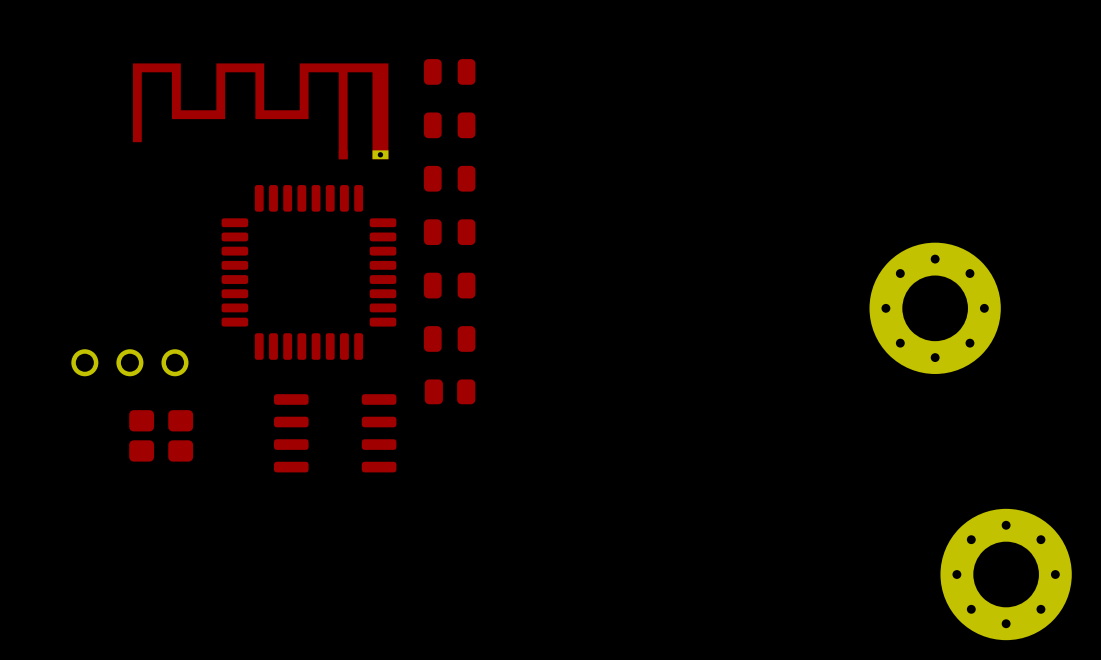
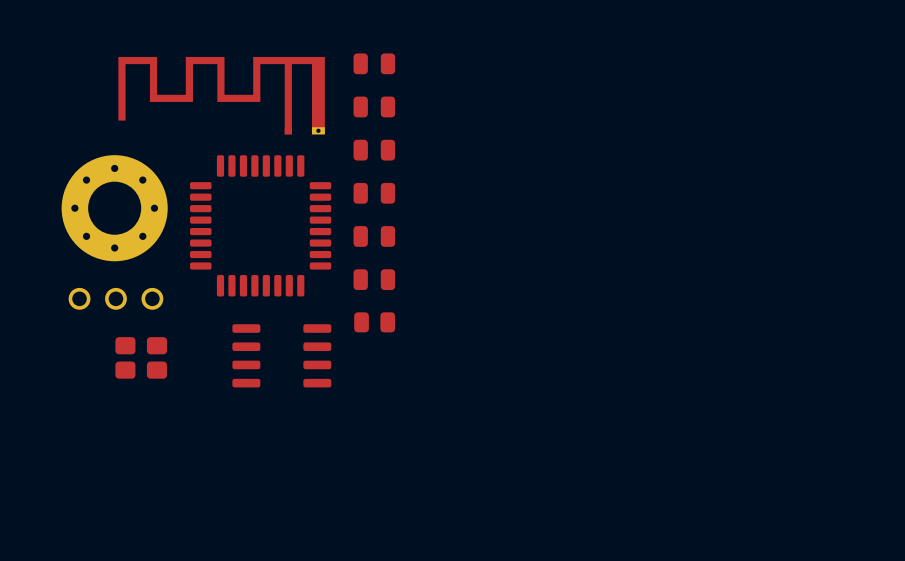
part: none -> (114, 208)
part: (935, 308) -> none
part: (1006, 574) -> none

